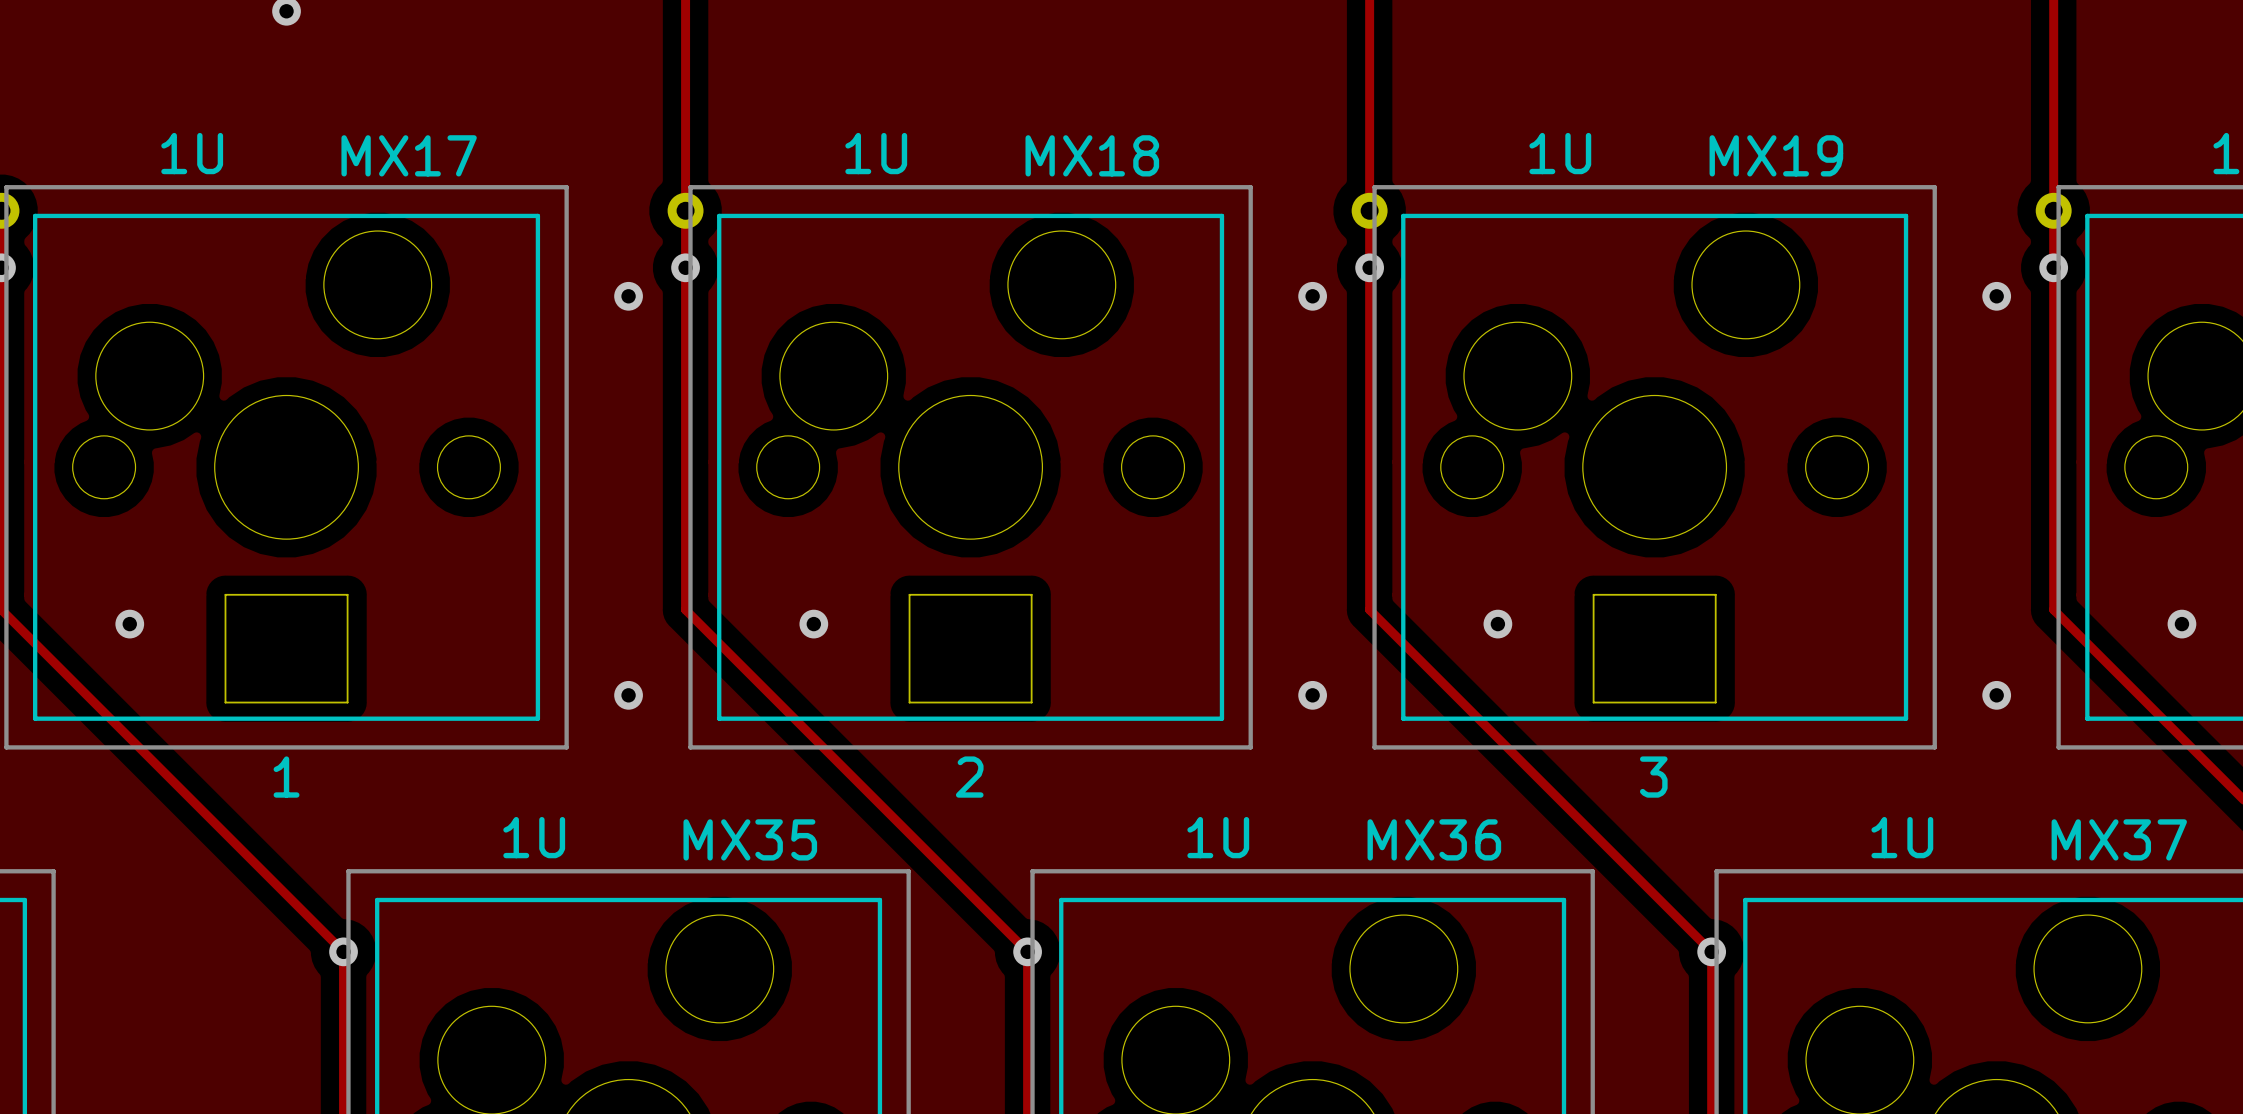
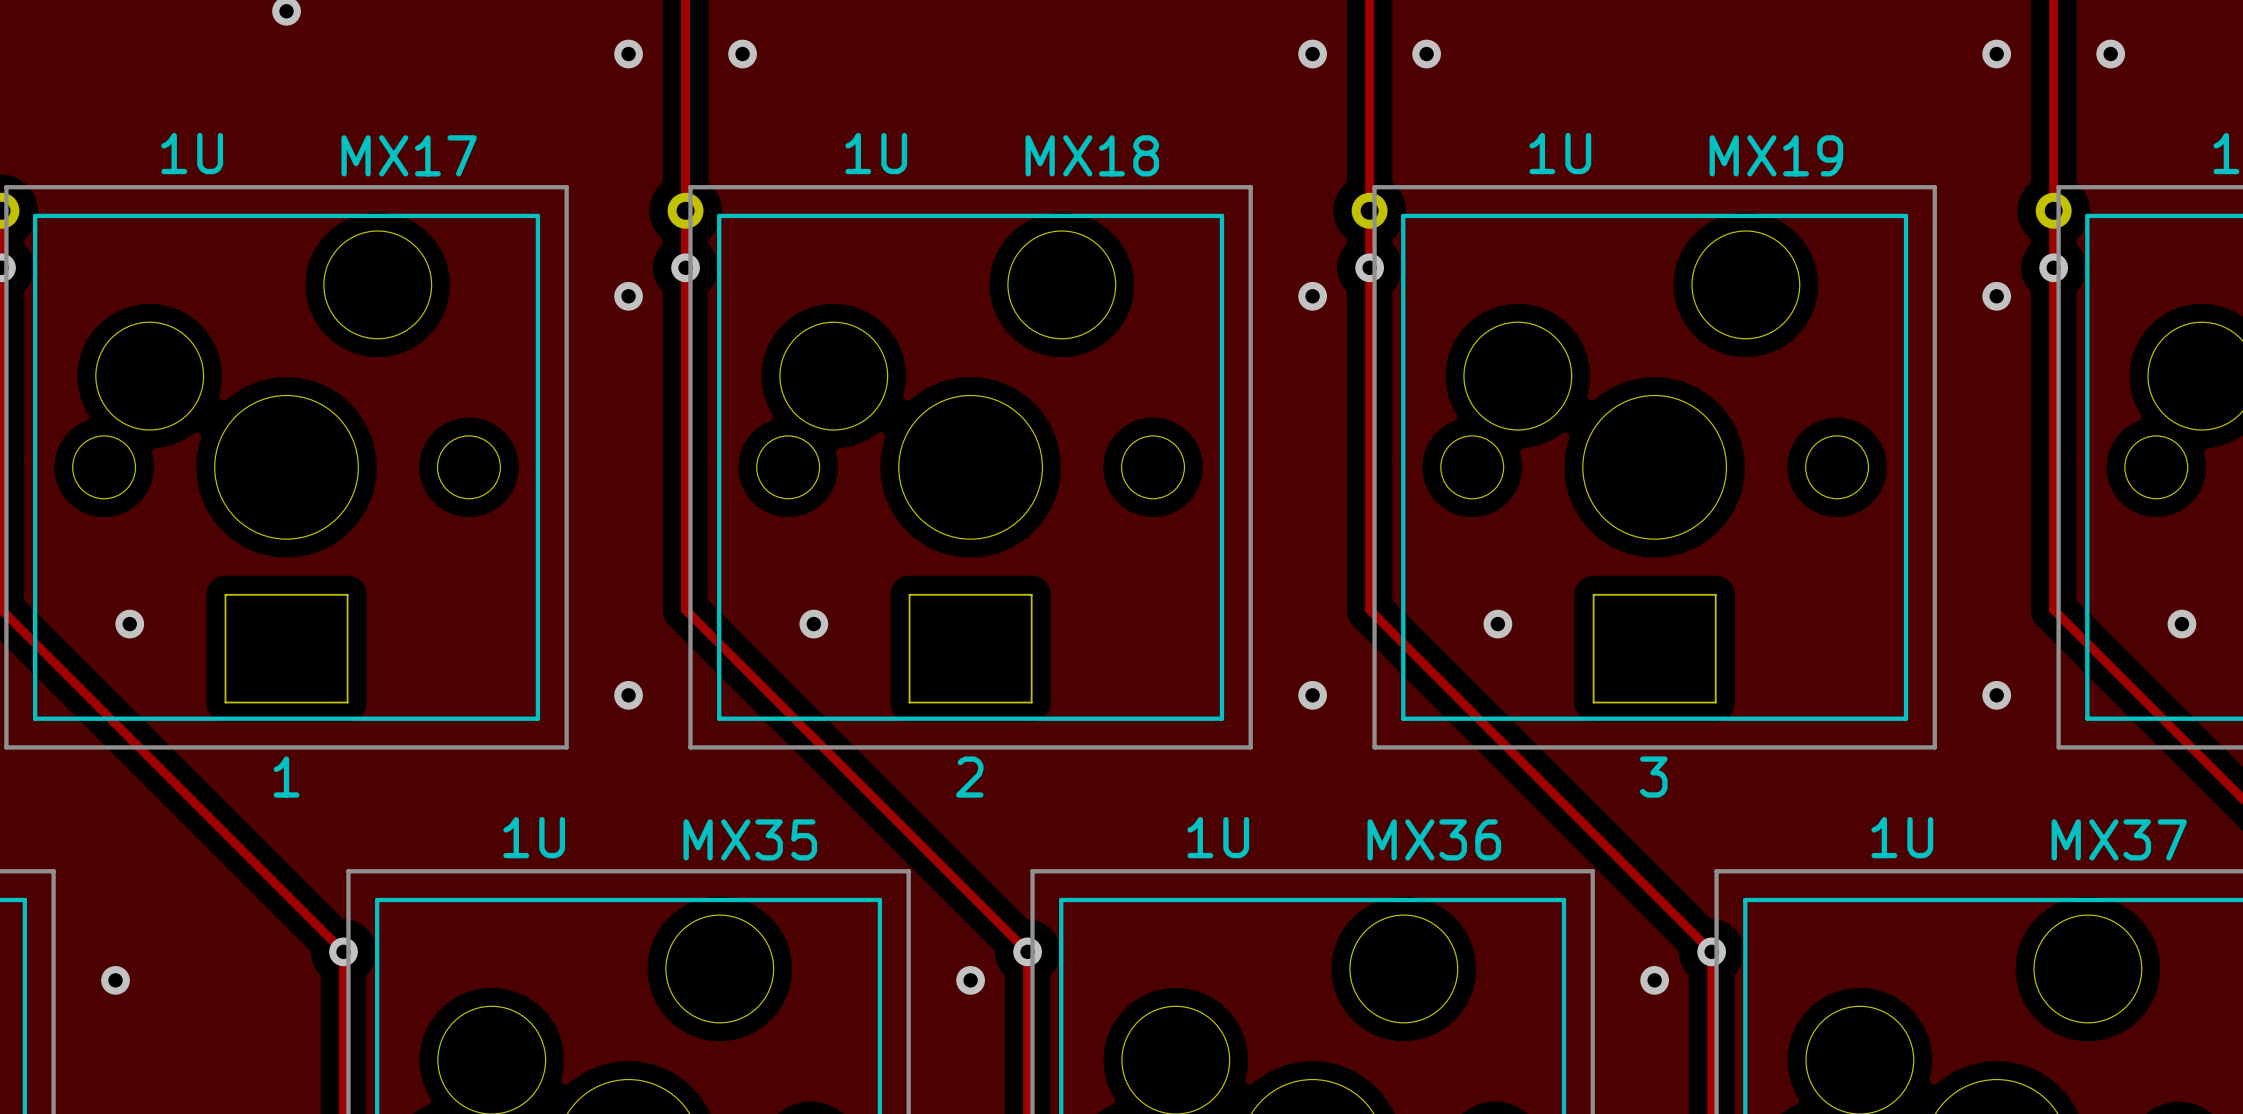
via: none -> (628, 54)
via: none -> (742, 54)
via: none -> (1312, 54)
via: none -> (1426, 54)
via: none -> (1996, 54)
via: none -> (2110, 54)
via: none -> (115, 980)
via: none -> (970, 980)
via: none -> (1654, 980)

